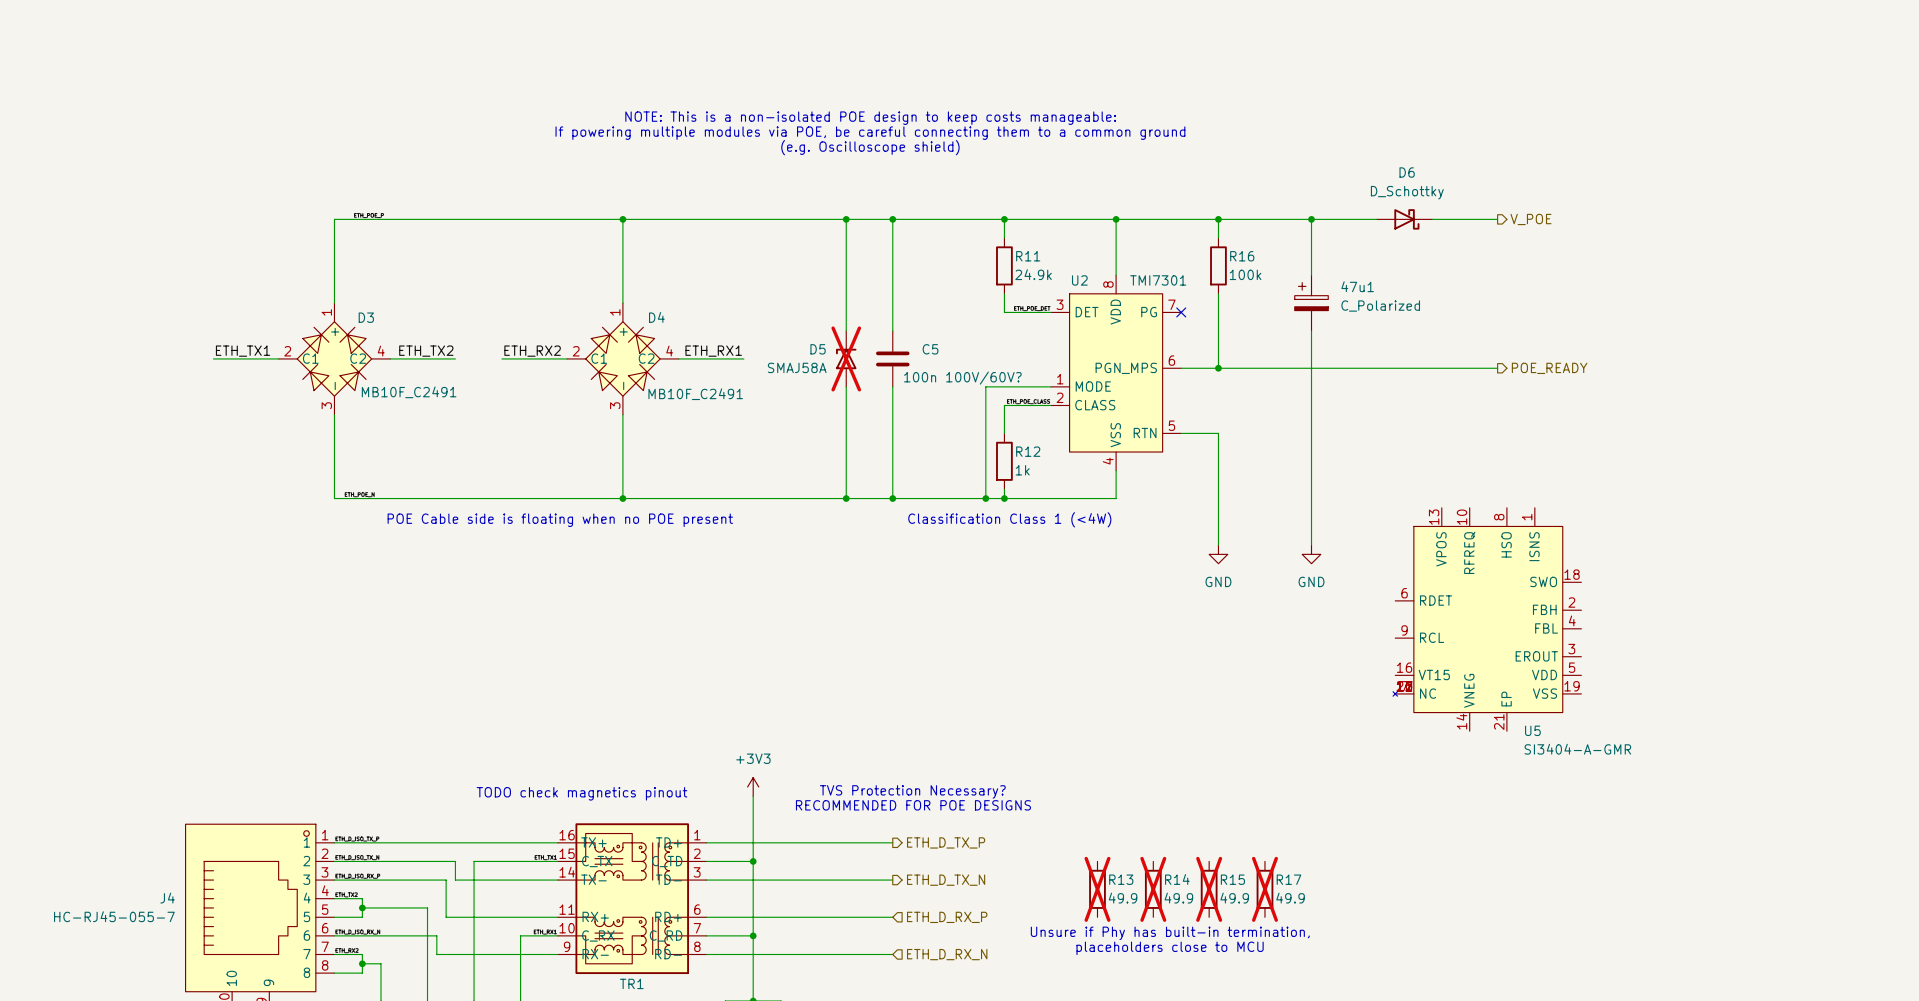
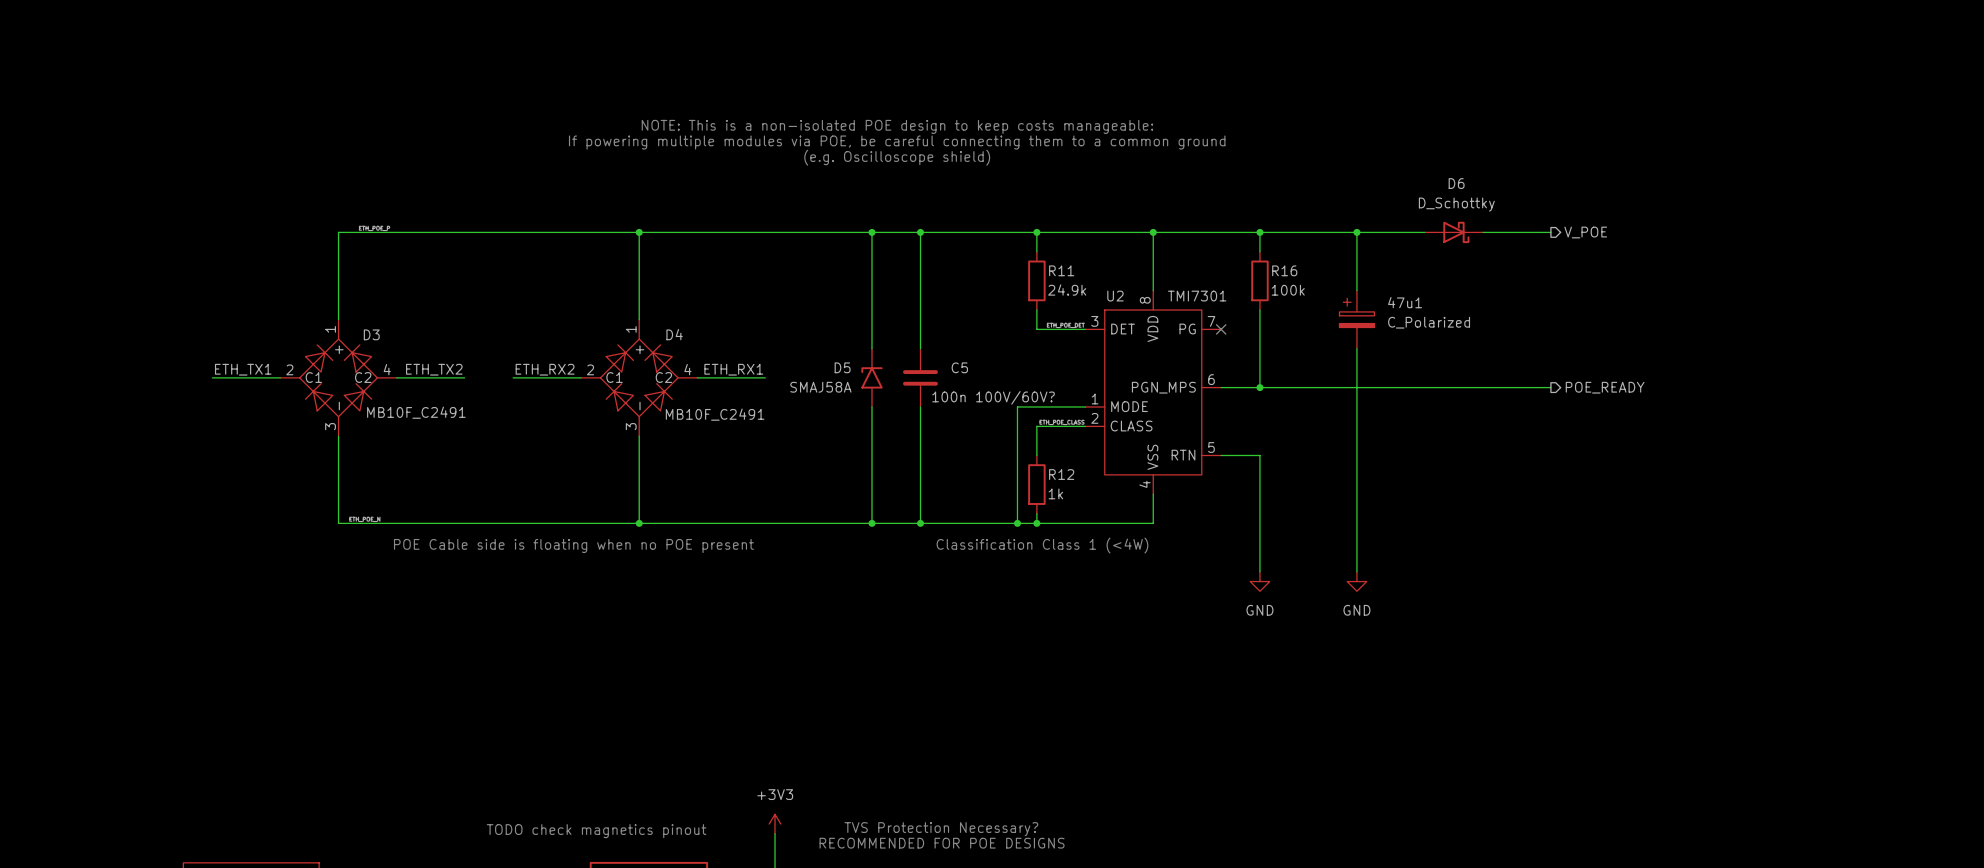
D5 do-not-place cross: (846, 358) -> none
U5: SI3404-A-GMR (1487, 619) -> none

